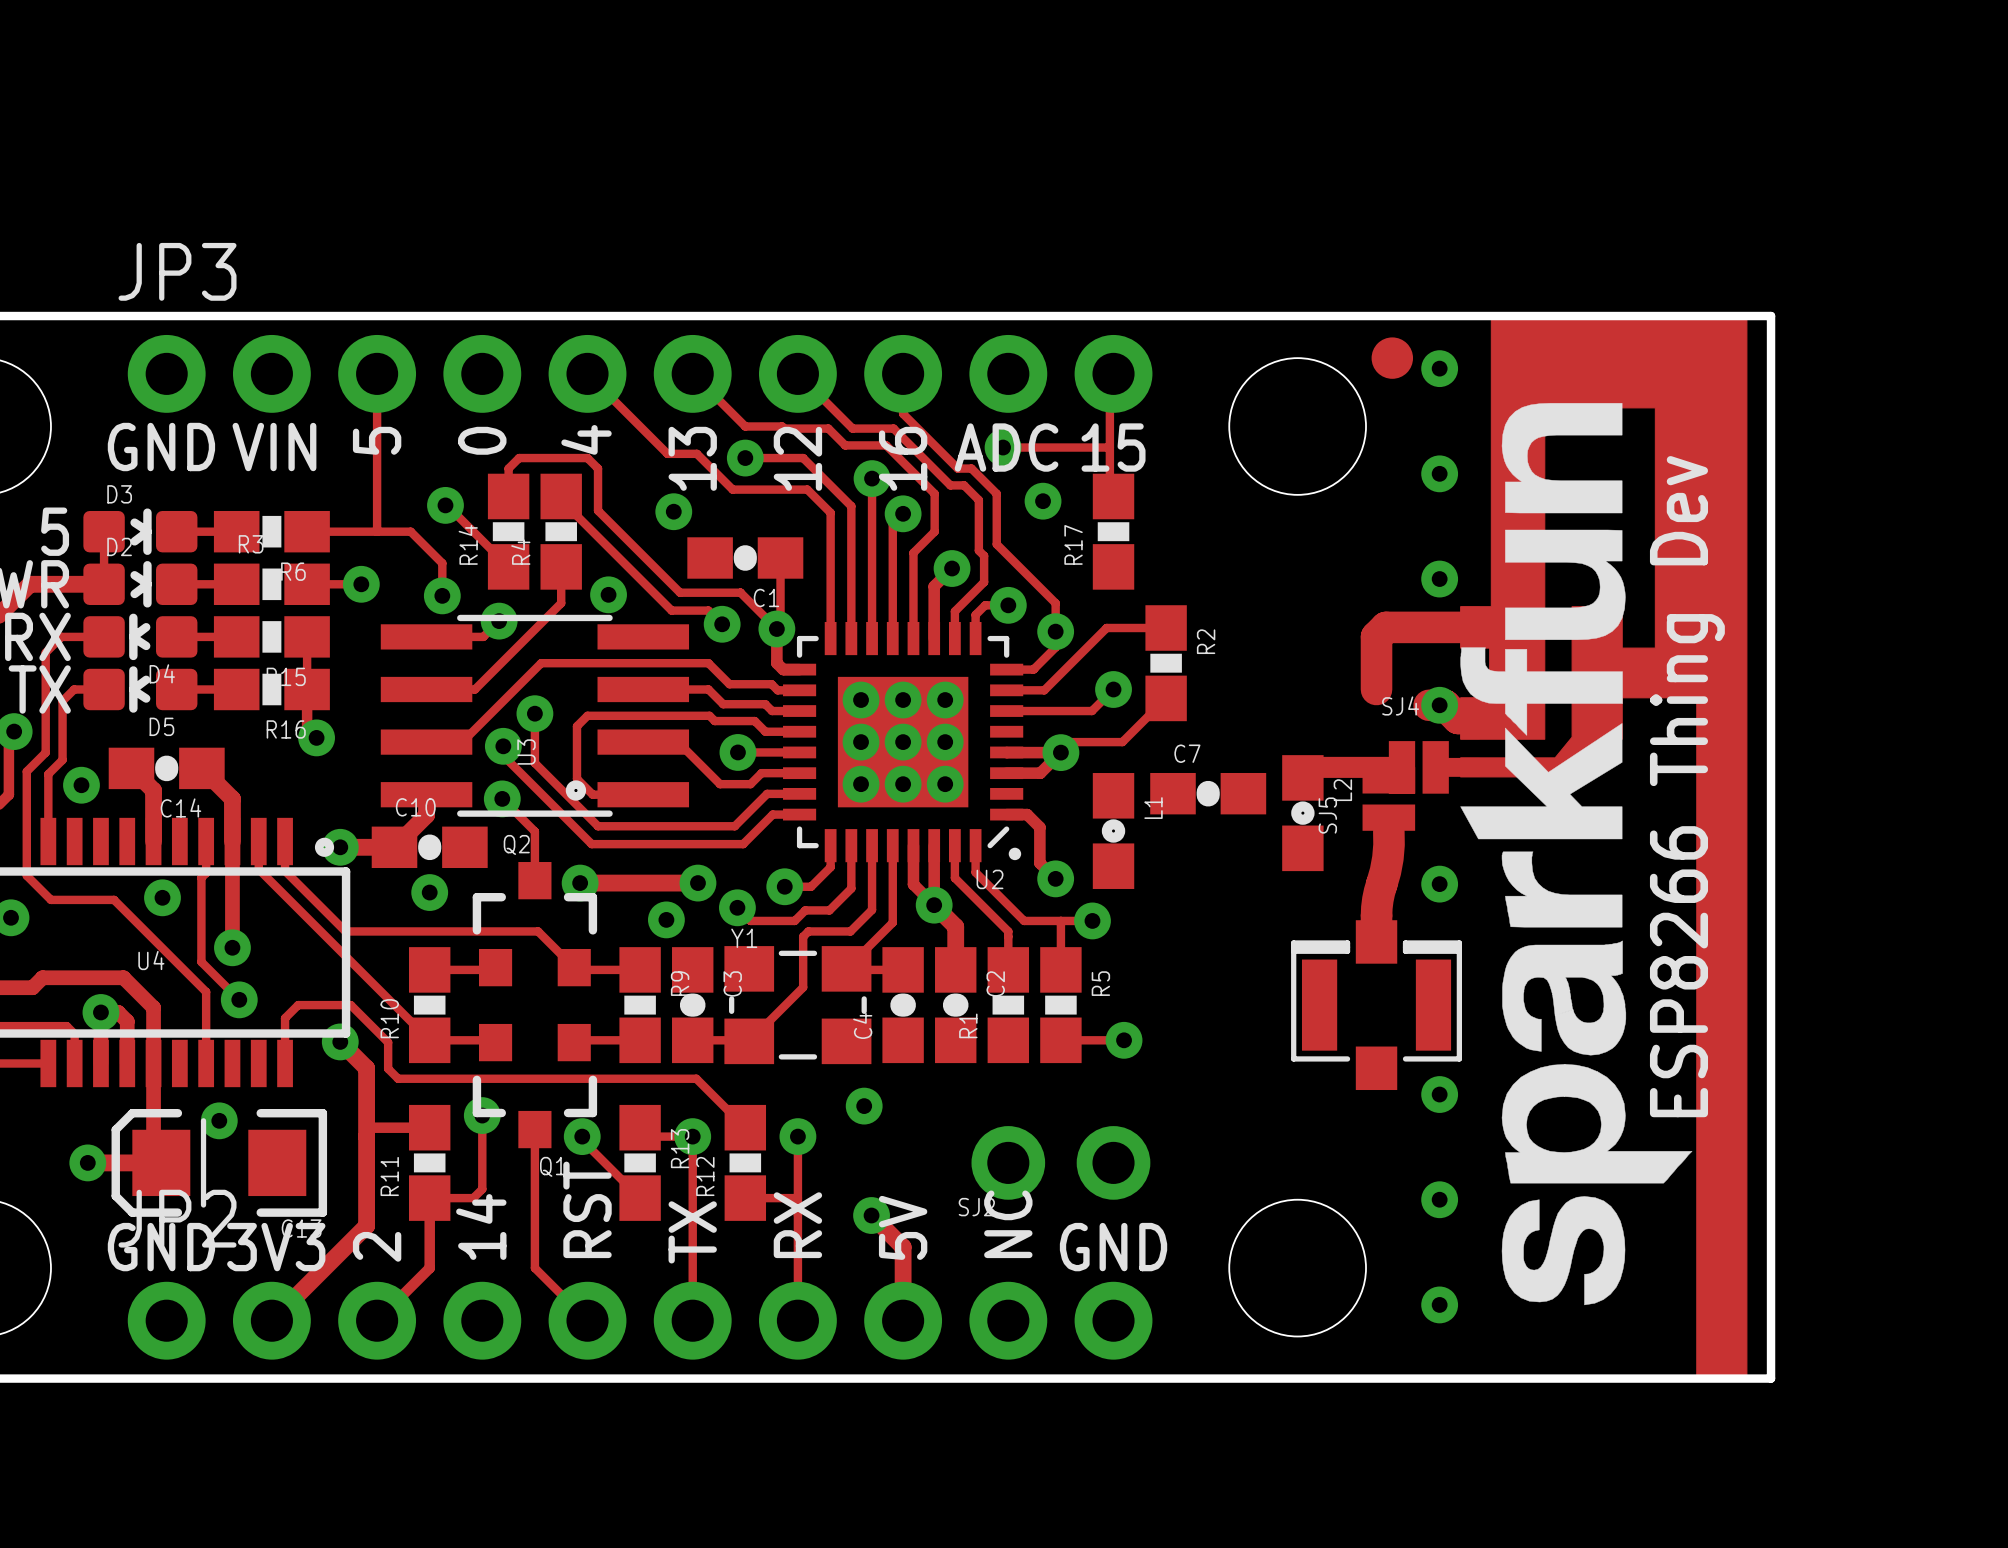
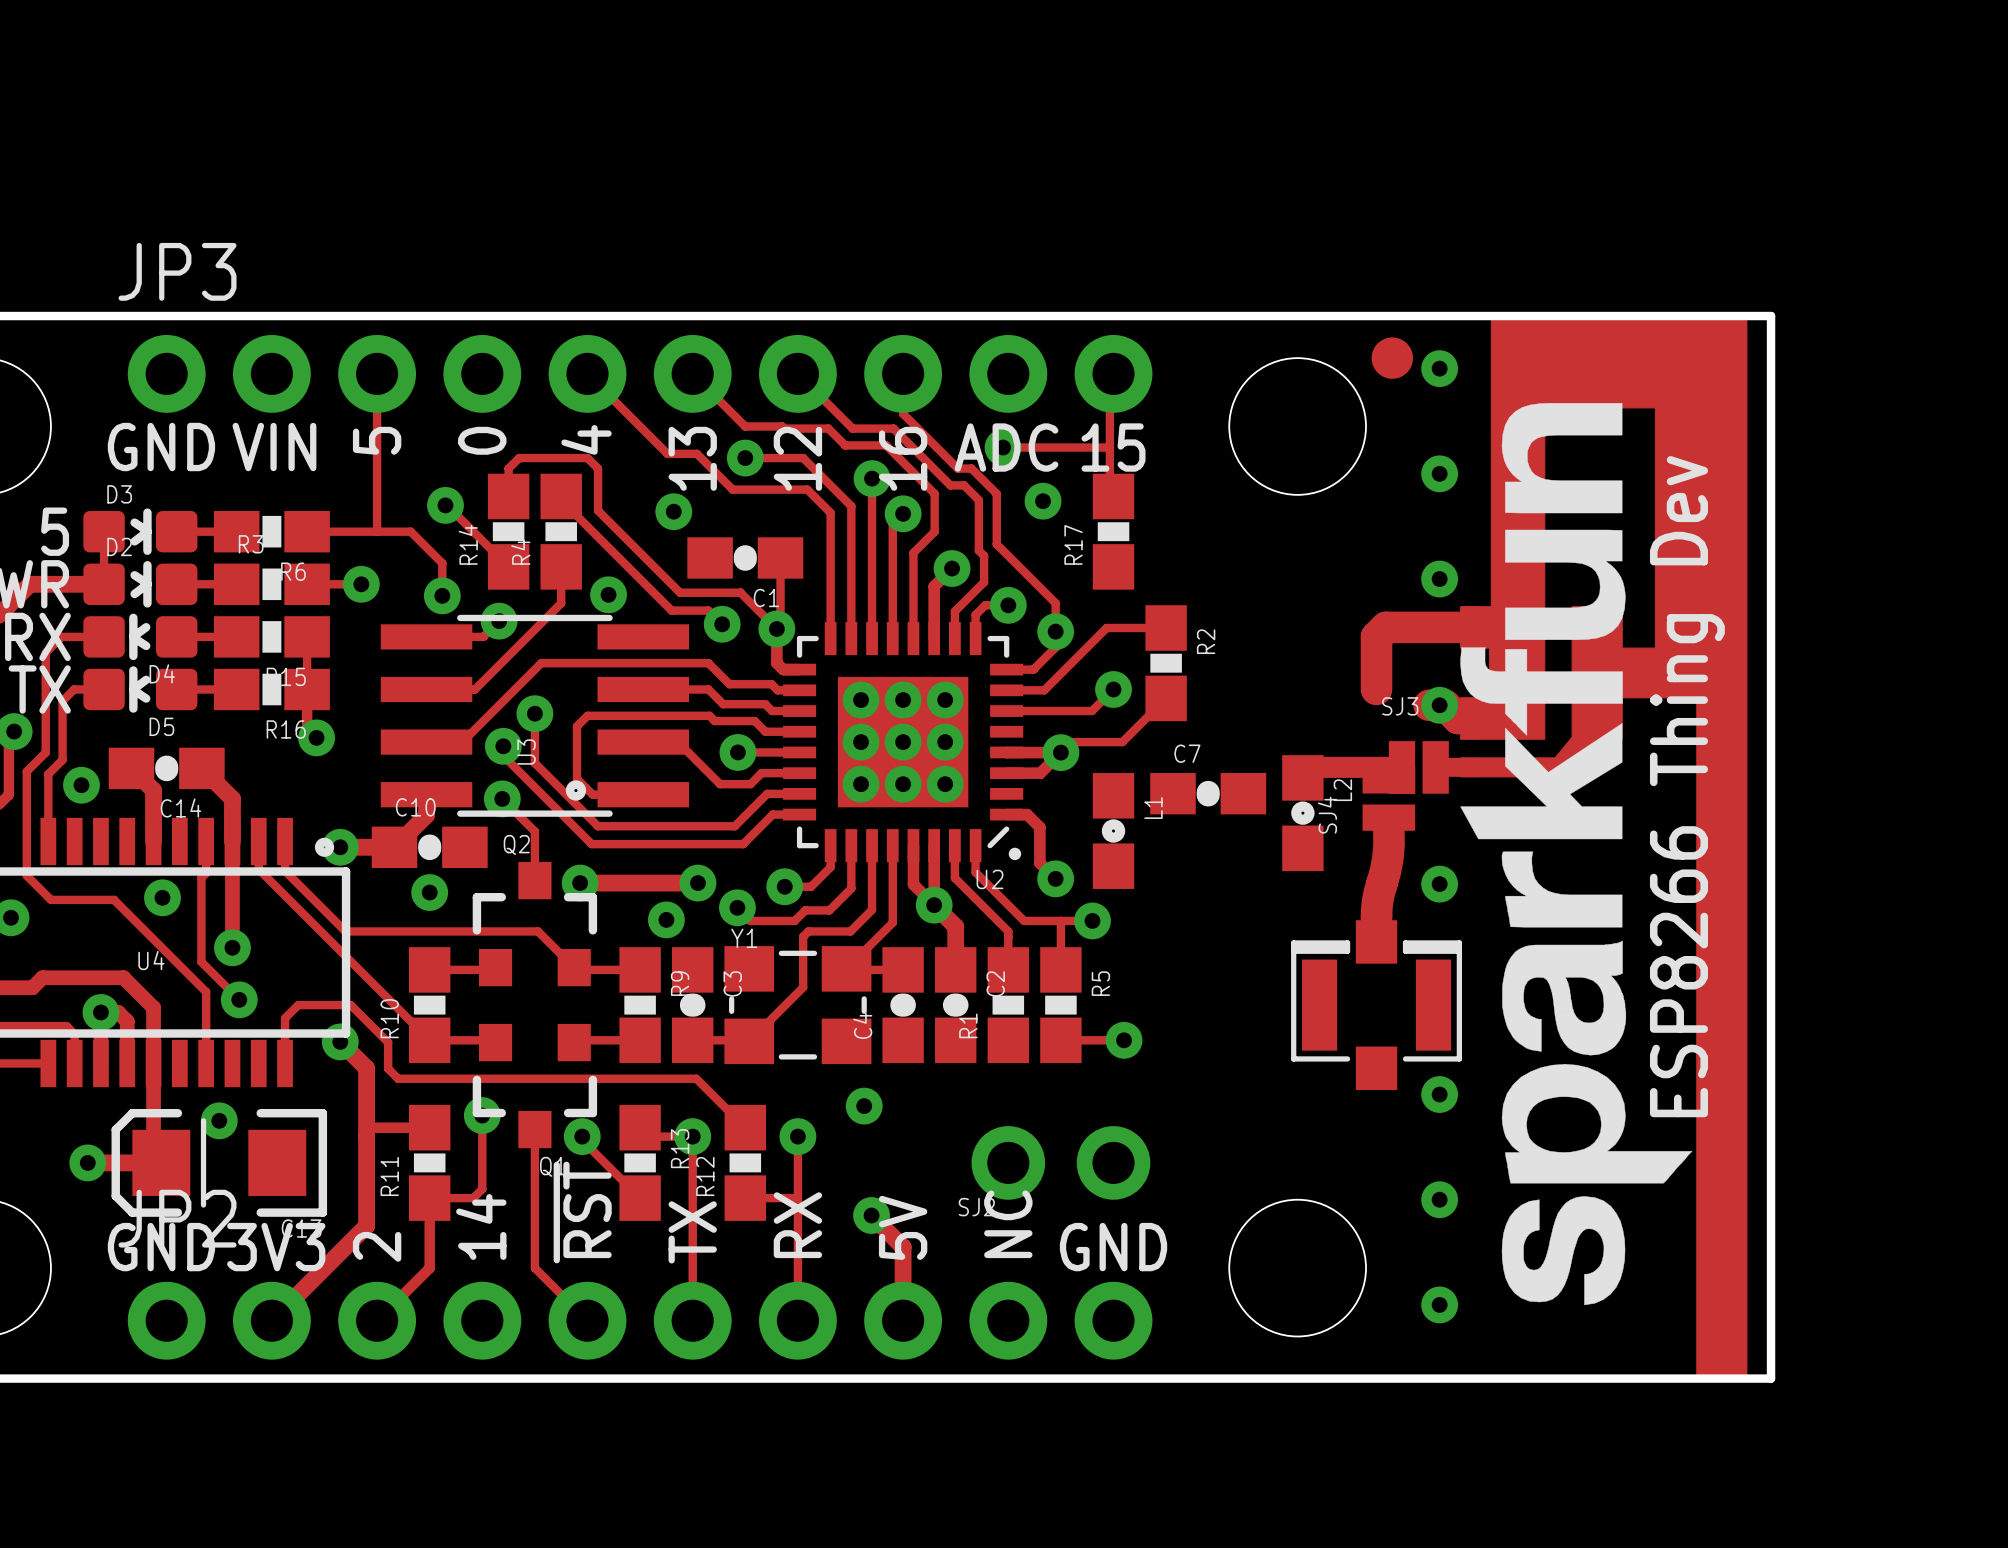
SJ4 name: SJ4 (1400, 705) -> SJ3 (1400, 706)
SJ5 name: SJ5 (1327, 815) -> SJ4 (1327, 815)
text: RST (587, 1209) -> ~{RST} (582, 1212)

